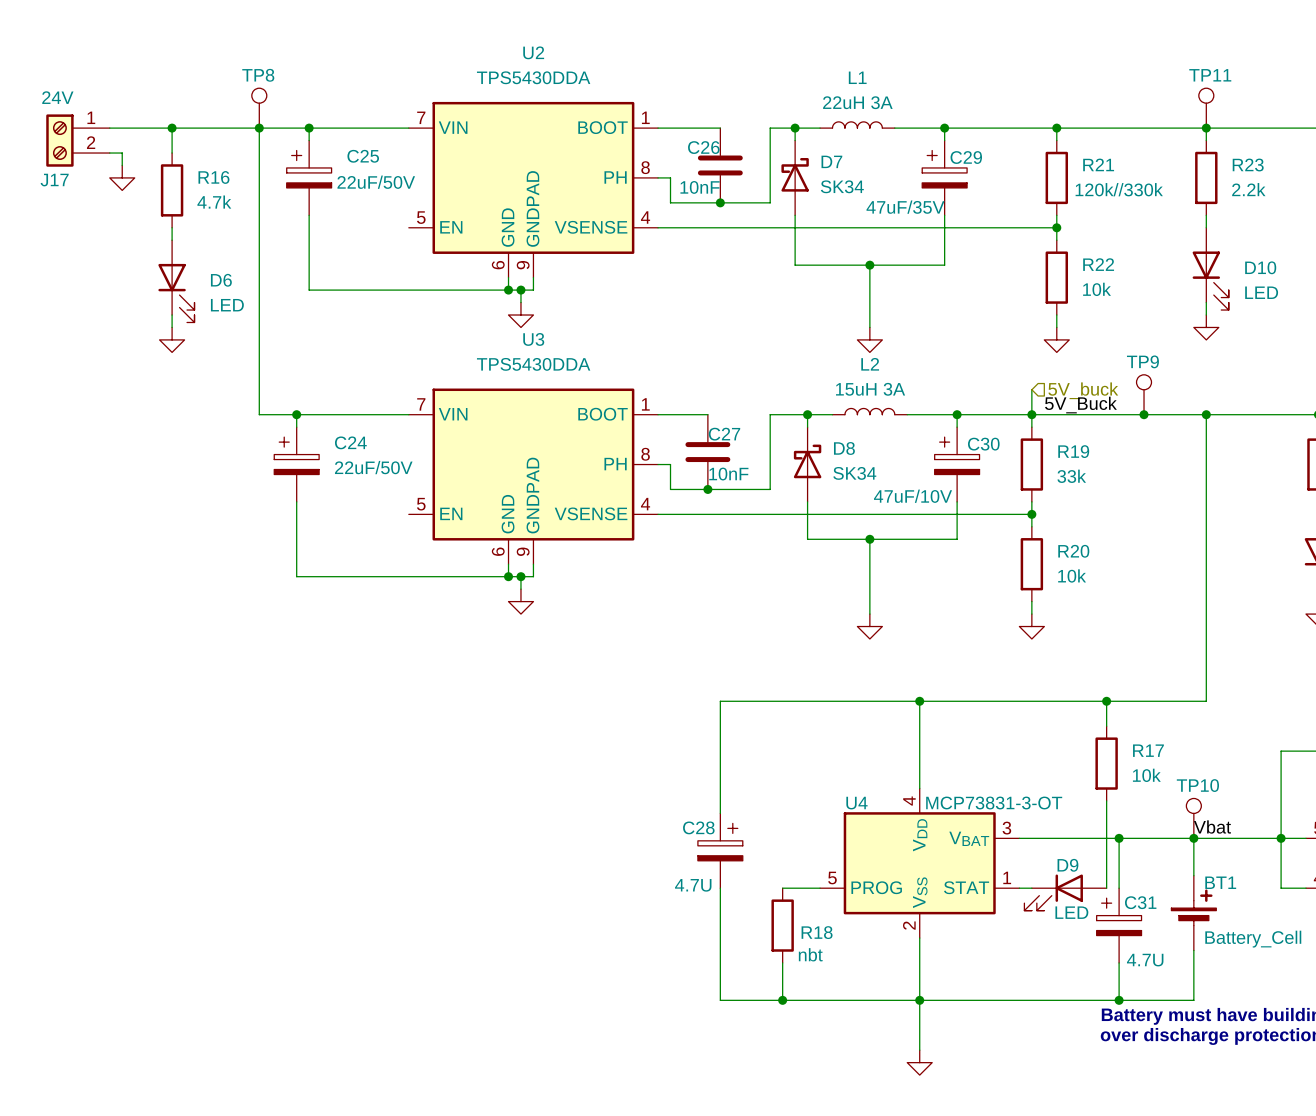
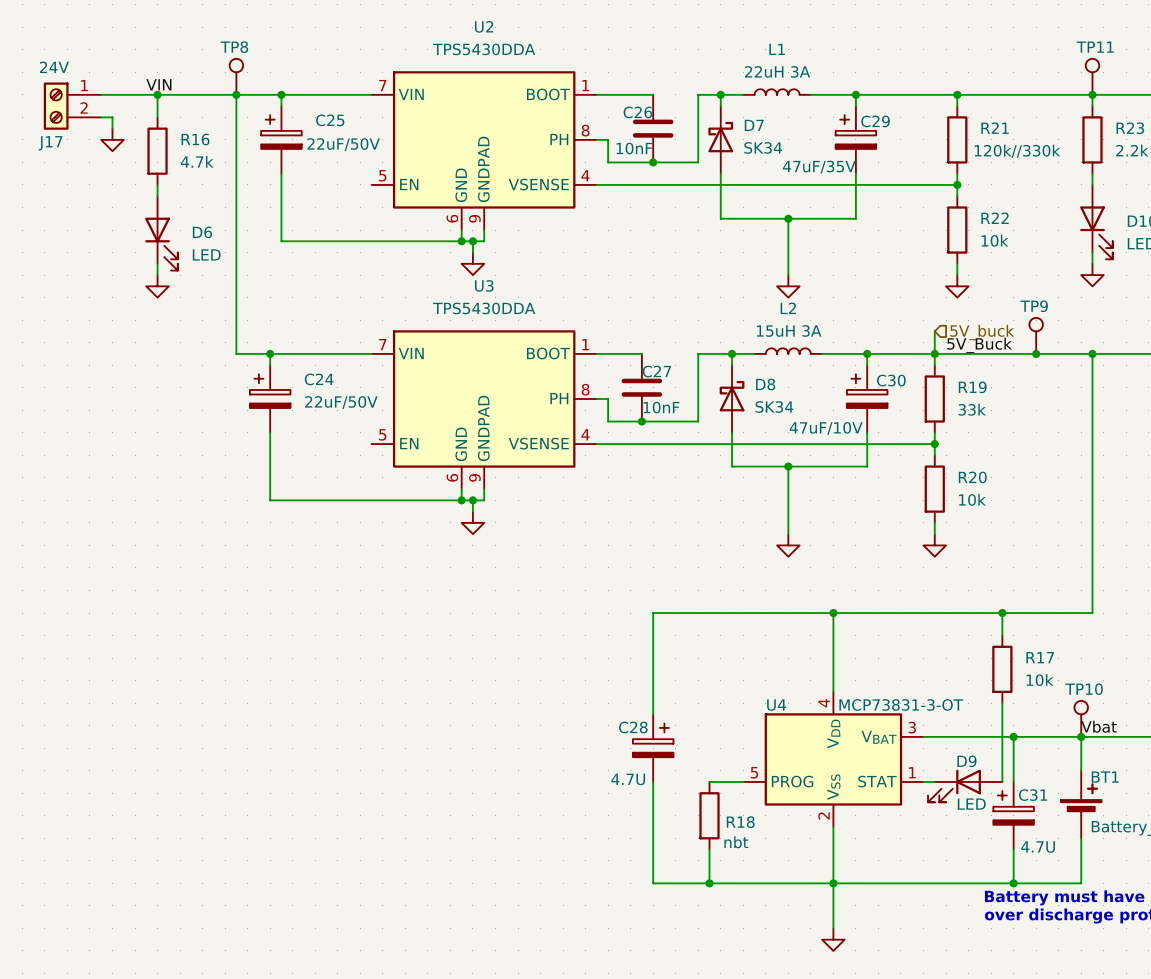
label: none -> VIN (158, 84)

